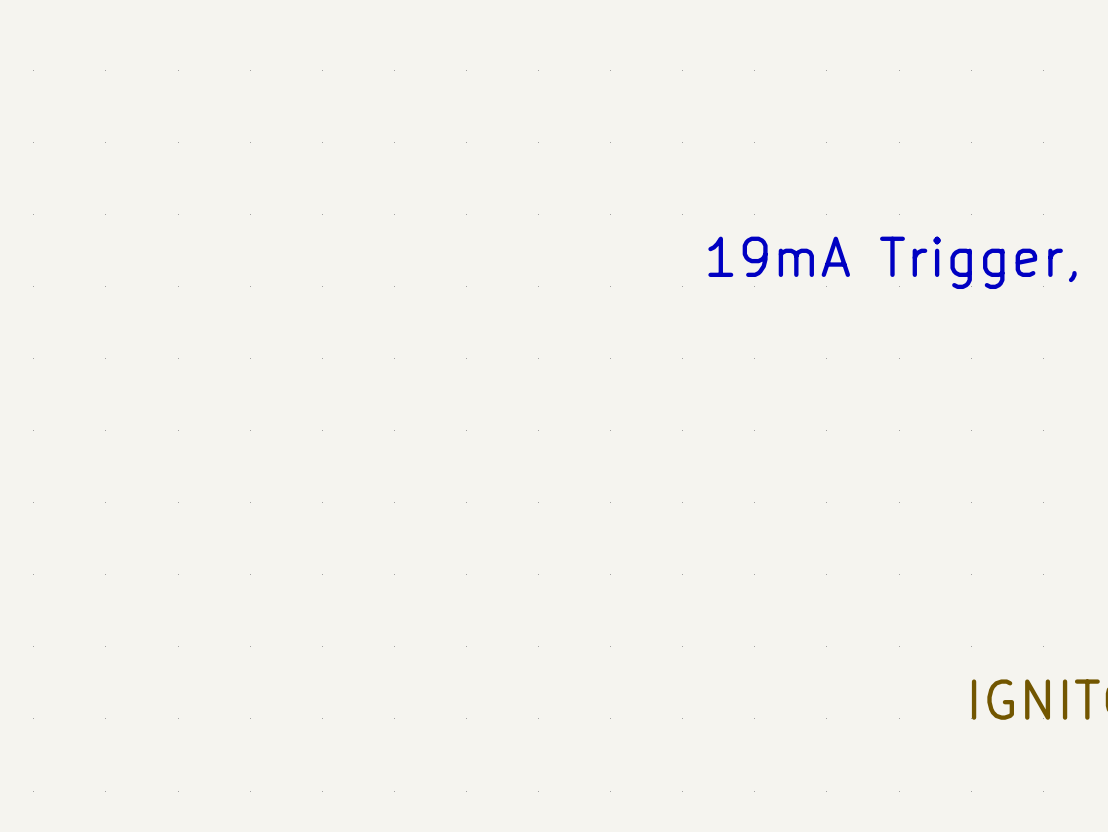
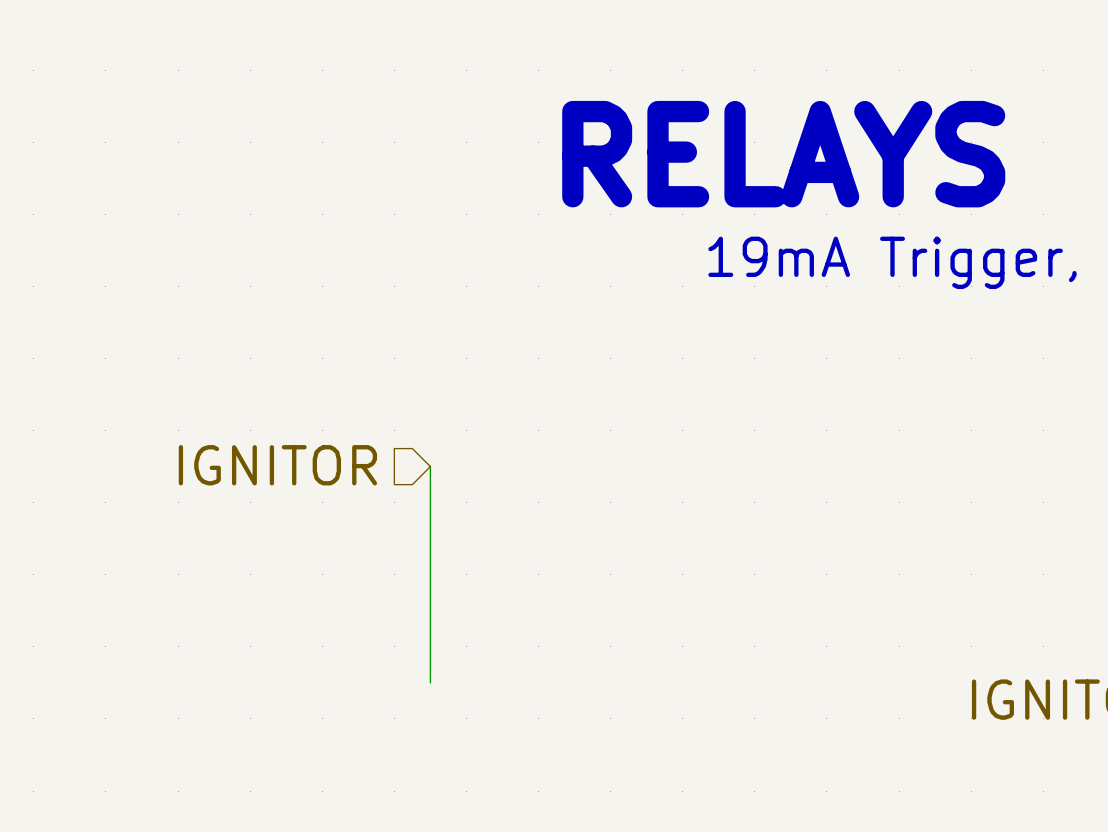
text: none -> RELAYS (783, 154)
hierarchical label: none -> IGNITOR (277, 465)
wire: none -> (430, 466) (430, 682)

